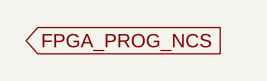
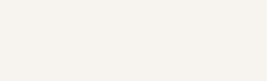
global label: FPGA_PROG_NCS (126, 42) -> none

